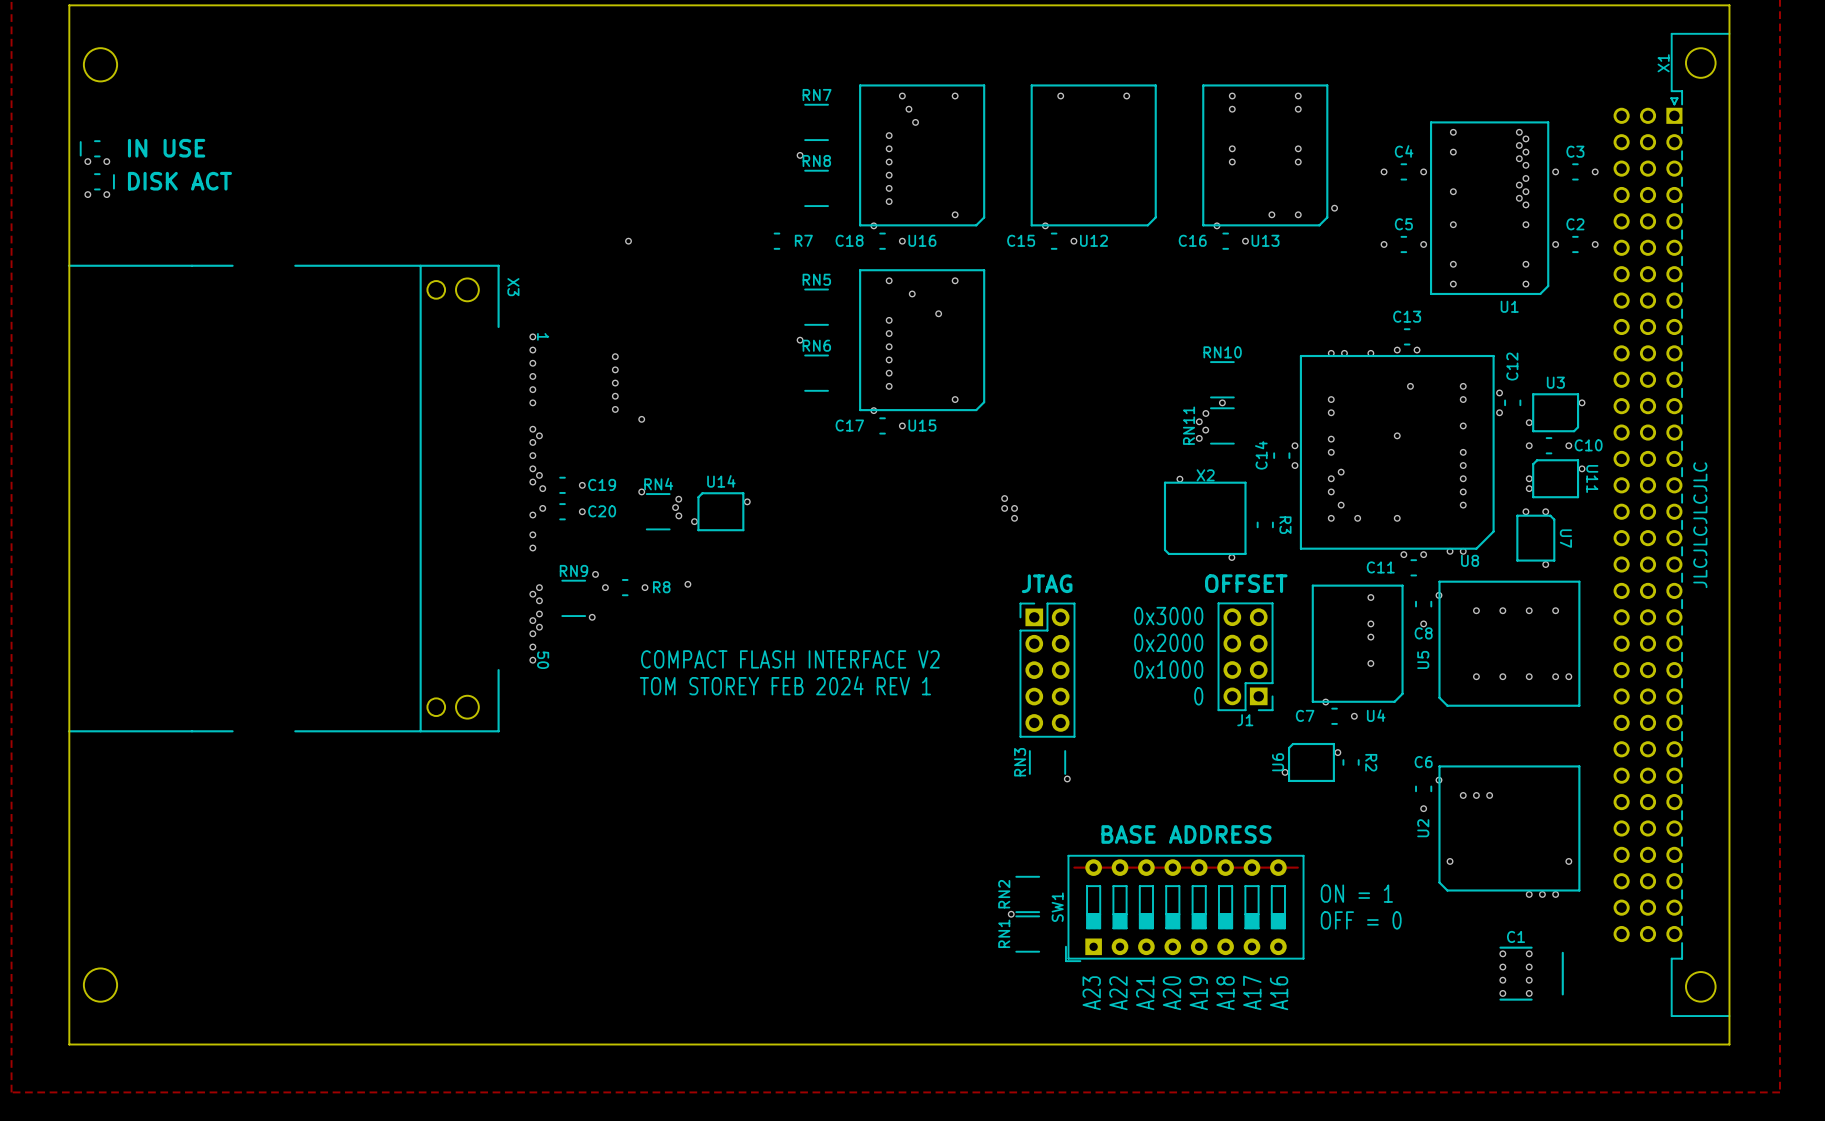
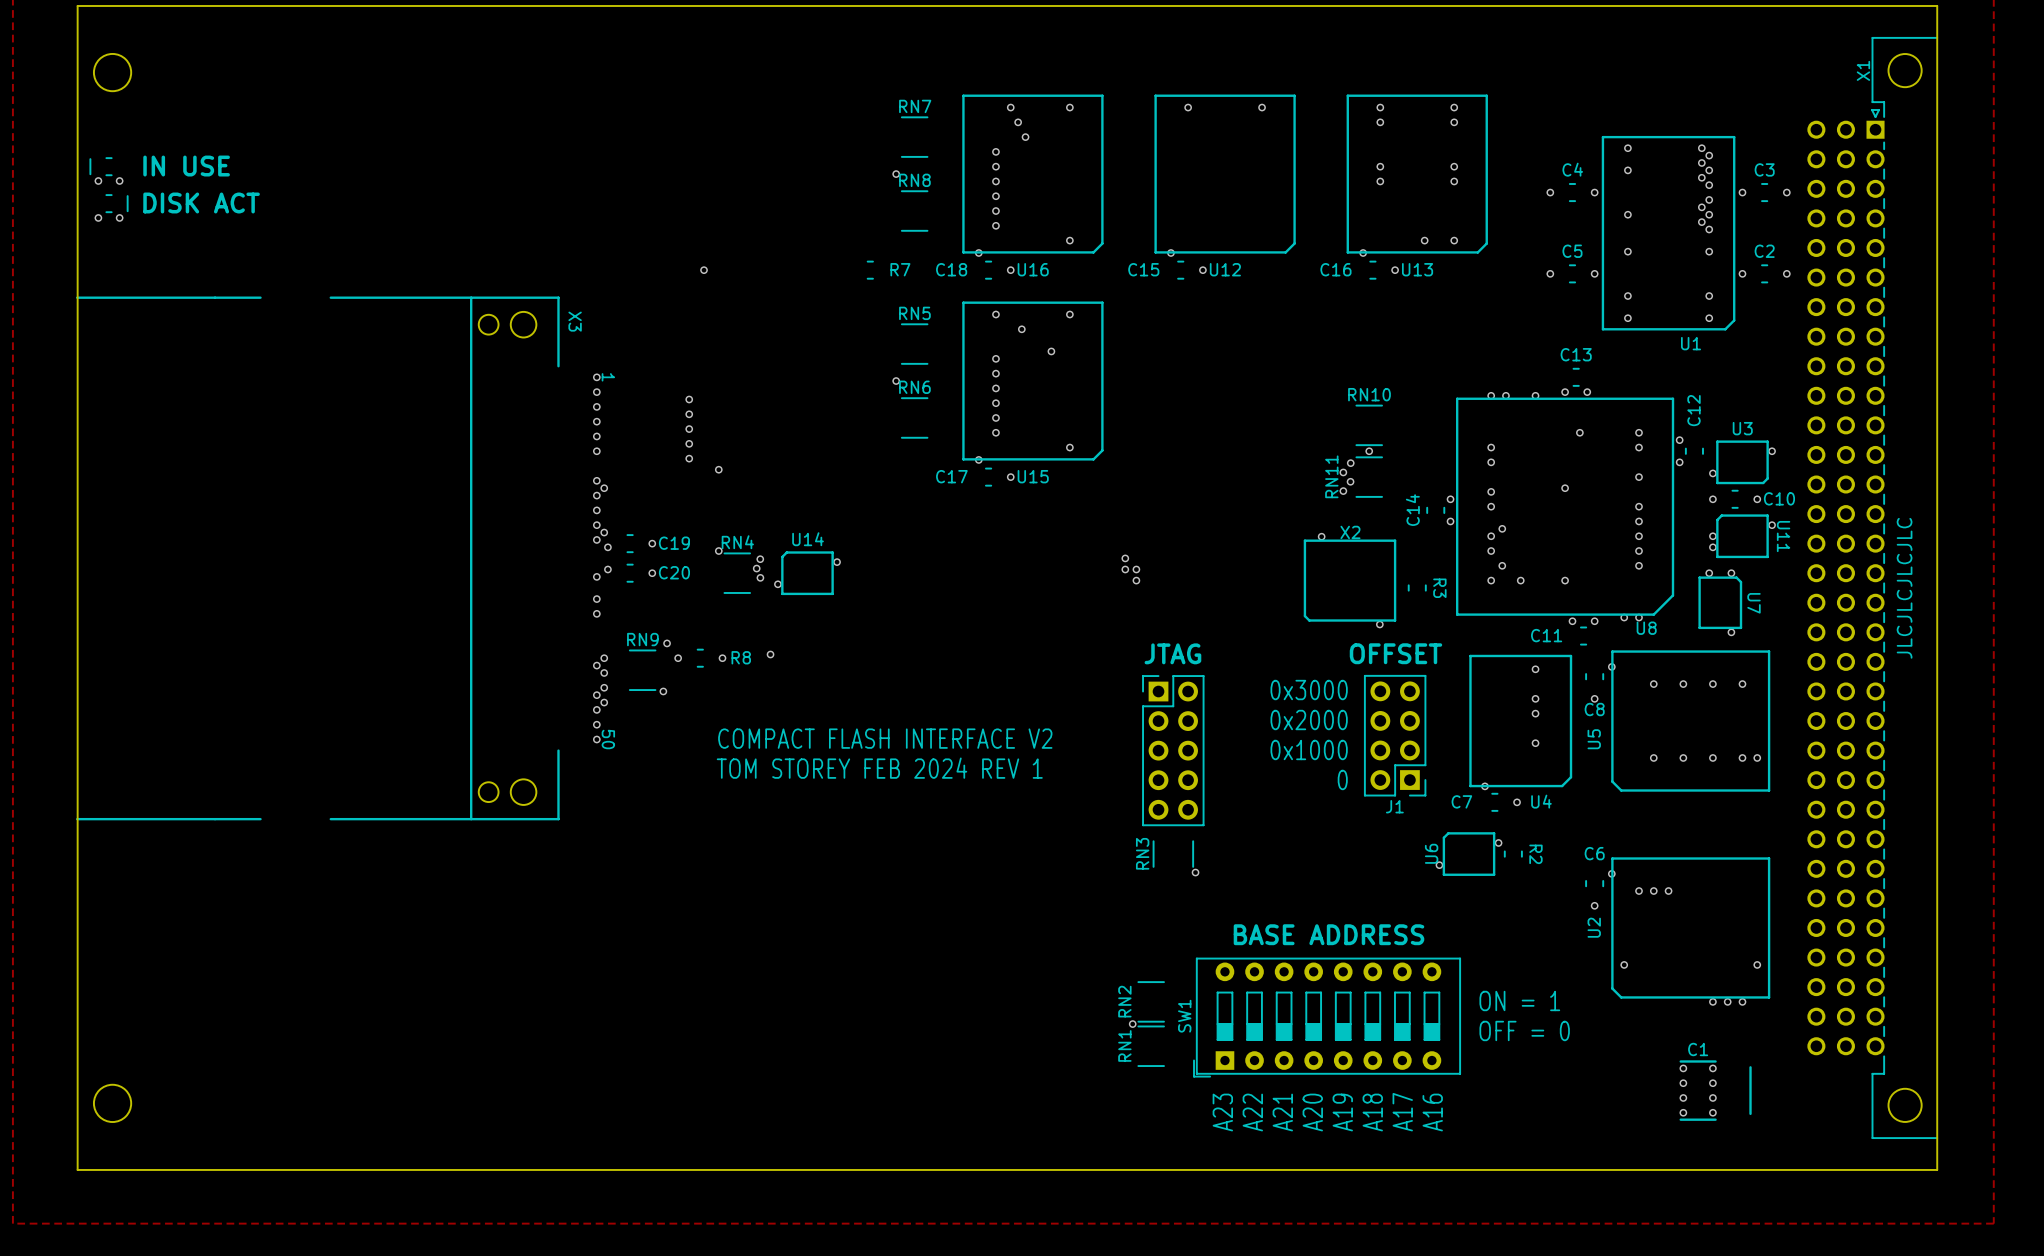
via: (1334, 208) -> none
track: (1074, 867) (1297, 867) -> none

